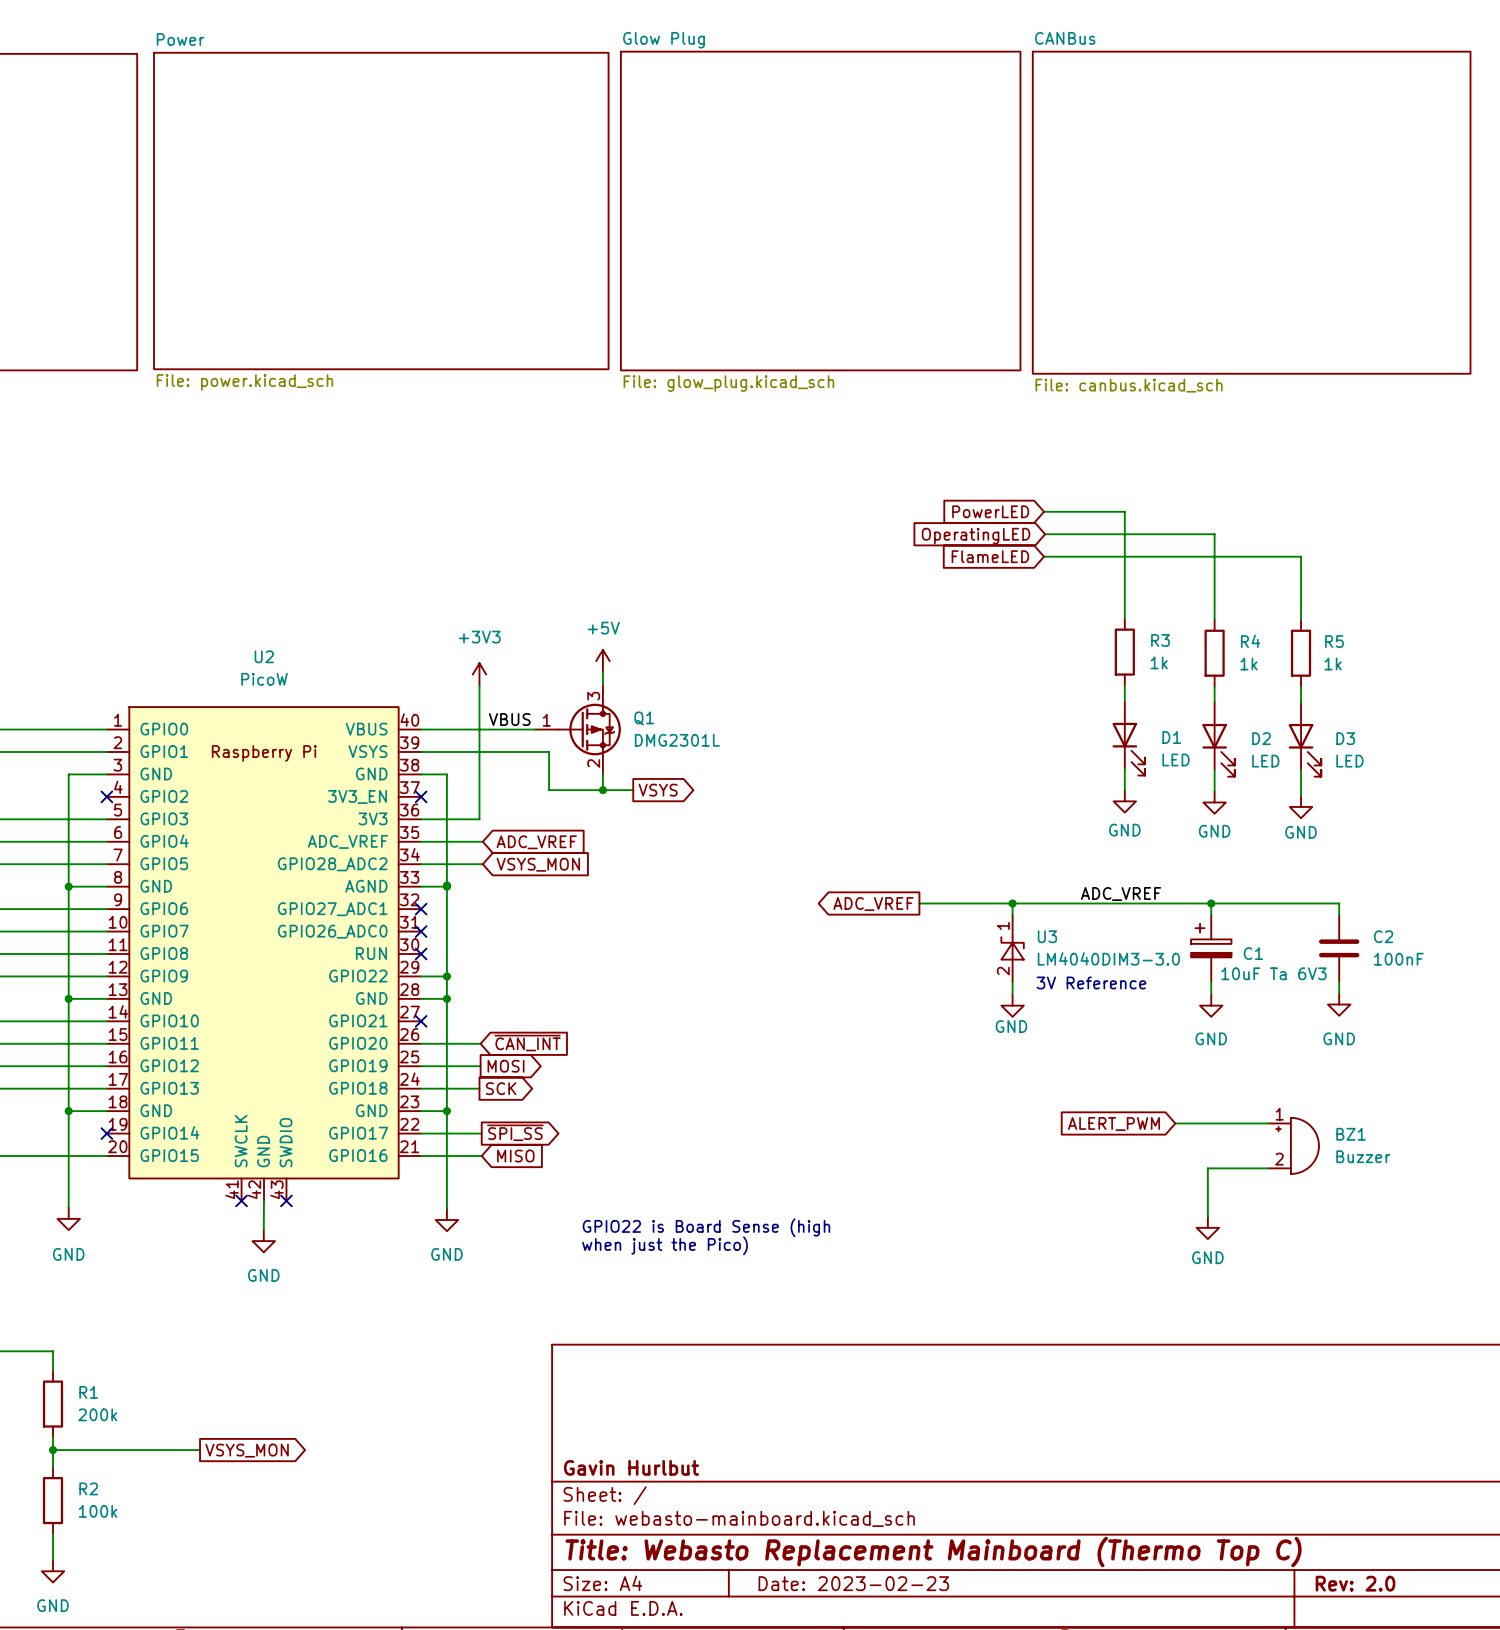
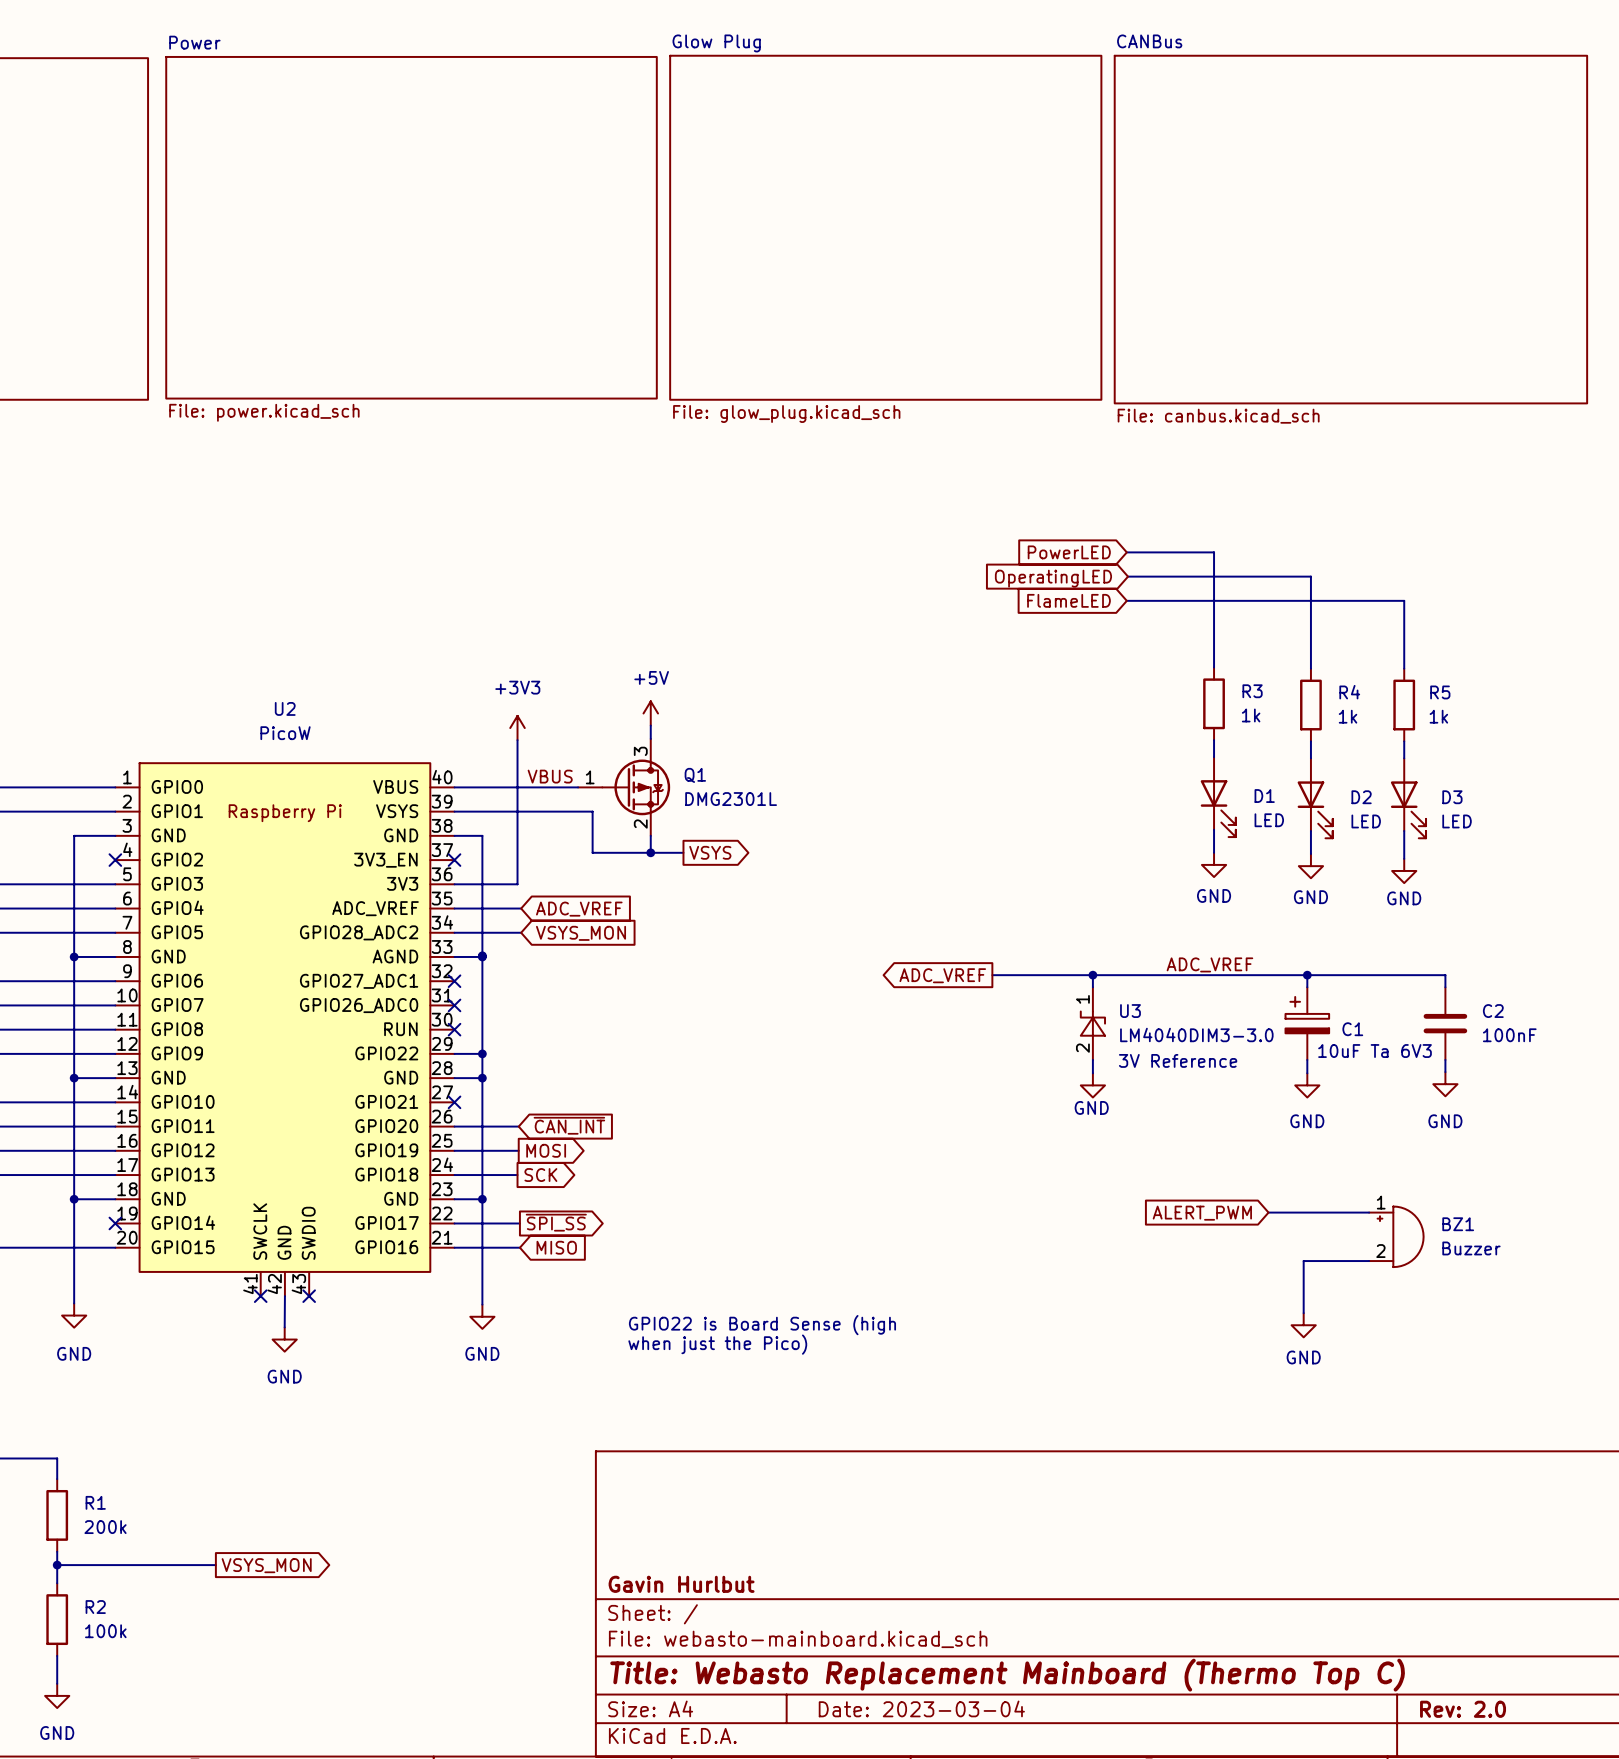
title block: Date: 2023-02-23 (853, 1583) -> Date: 2023-03-04 (921, 1708)

